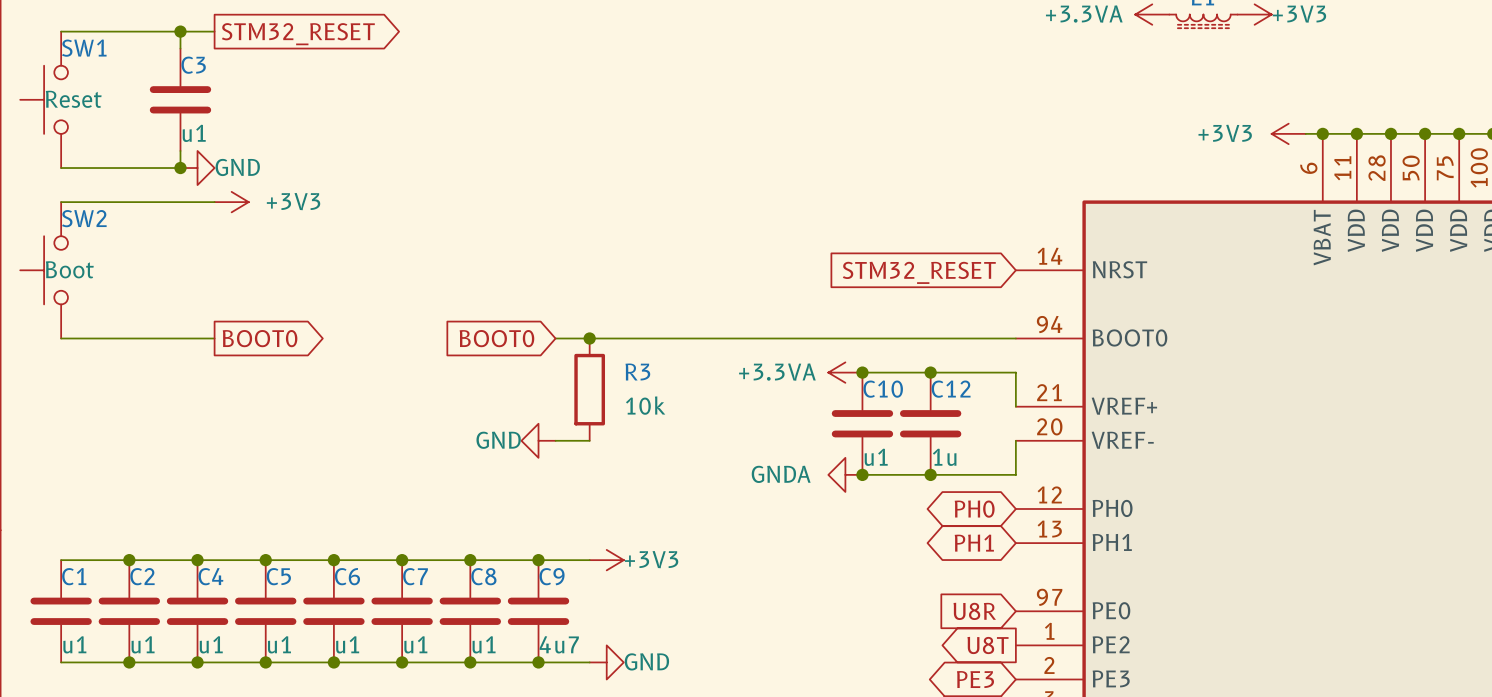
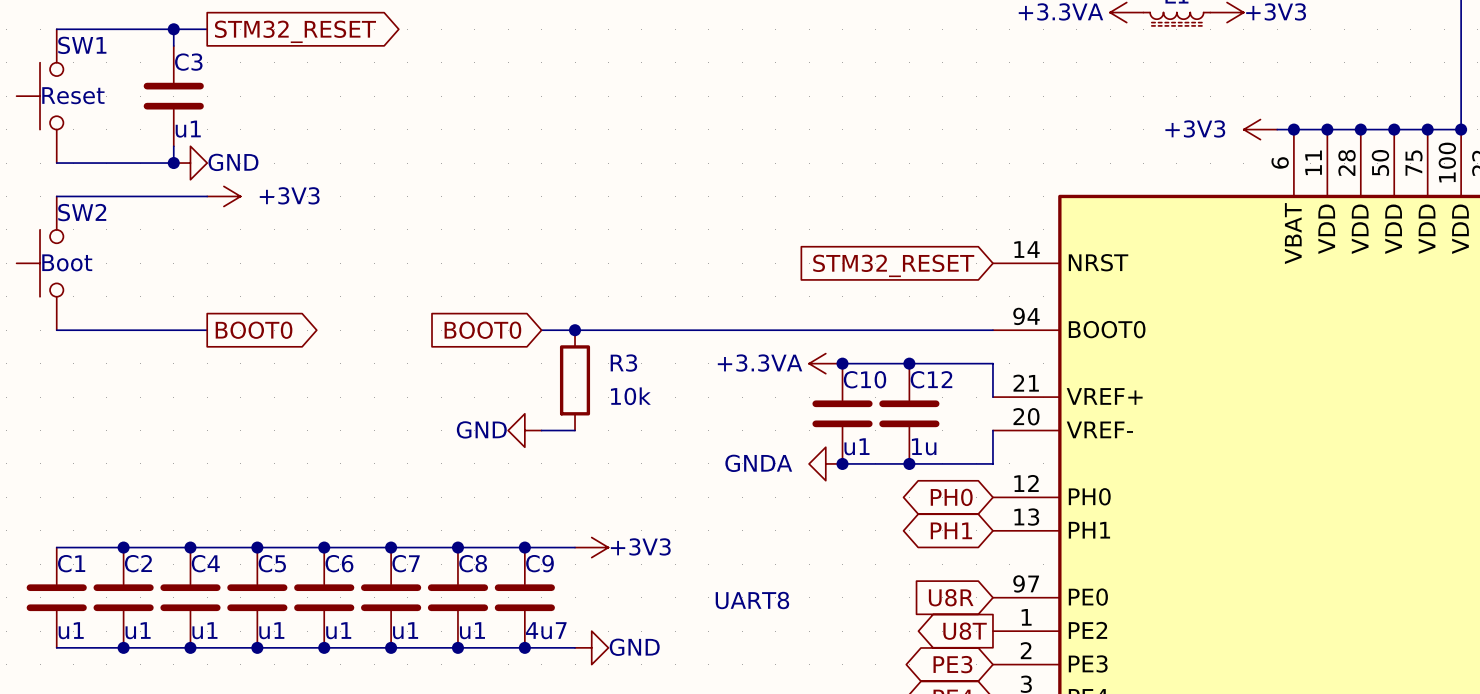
text: none -> UART8 (752, 600)

